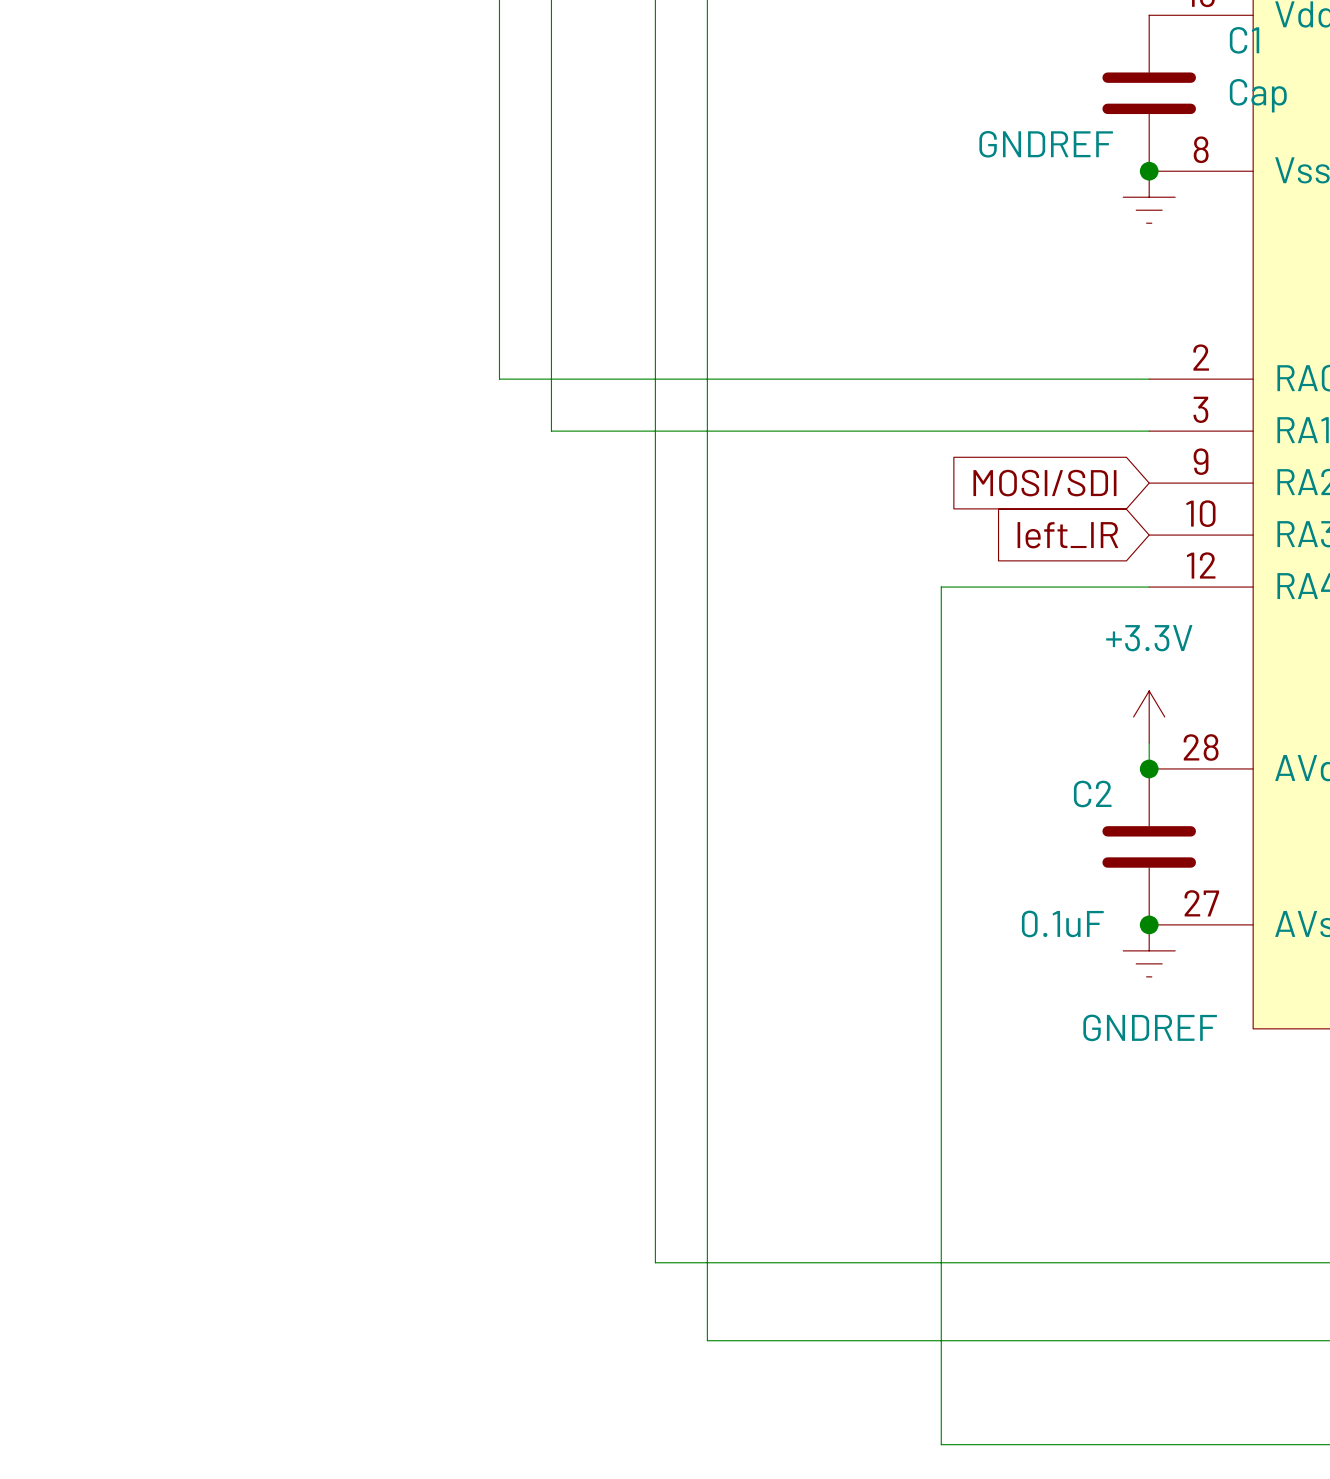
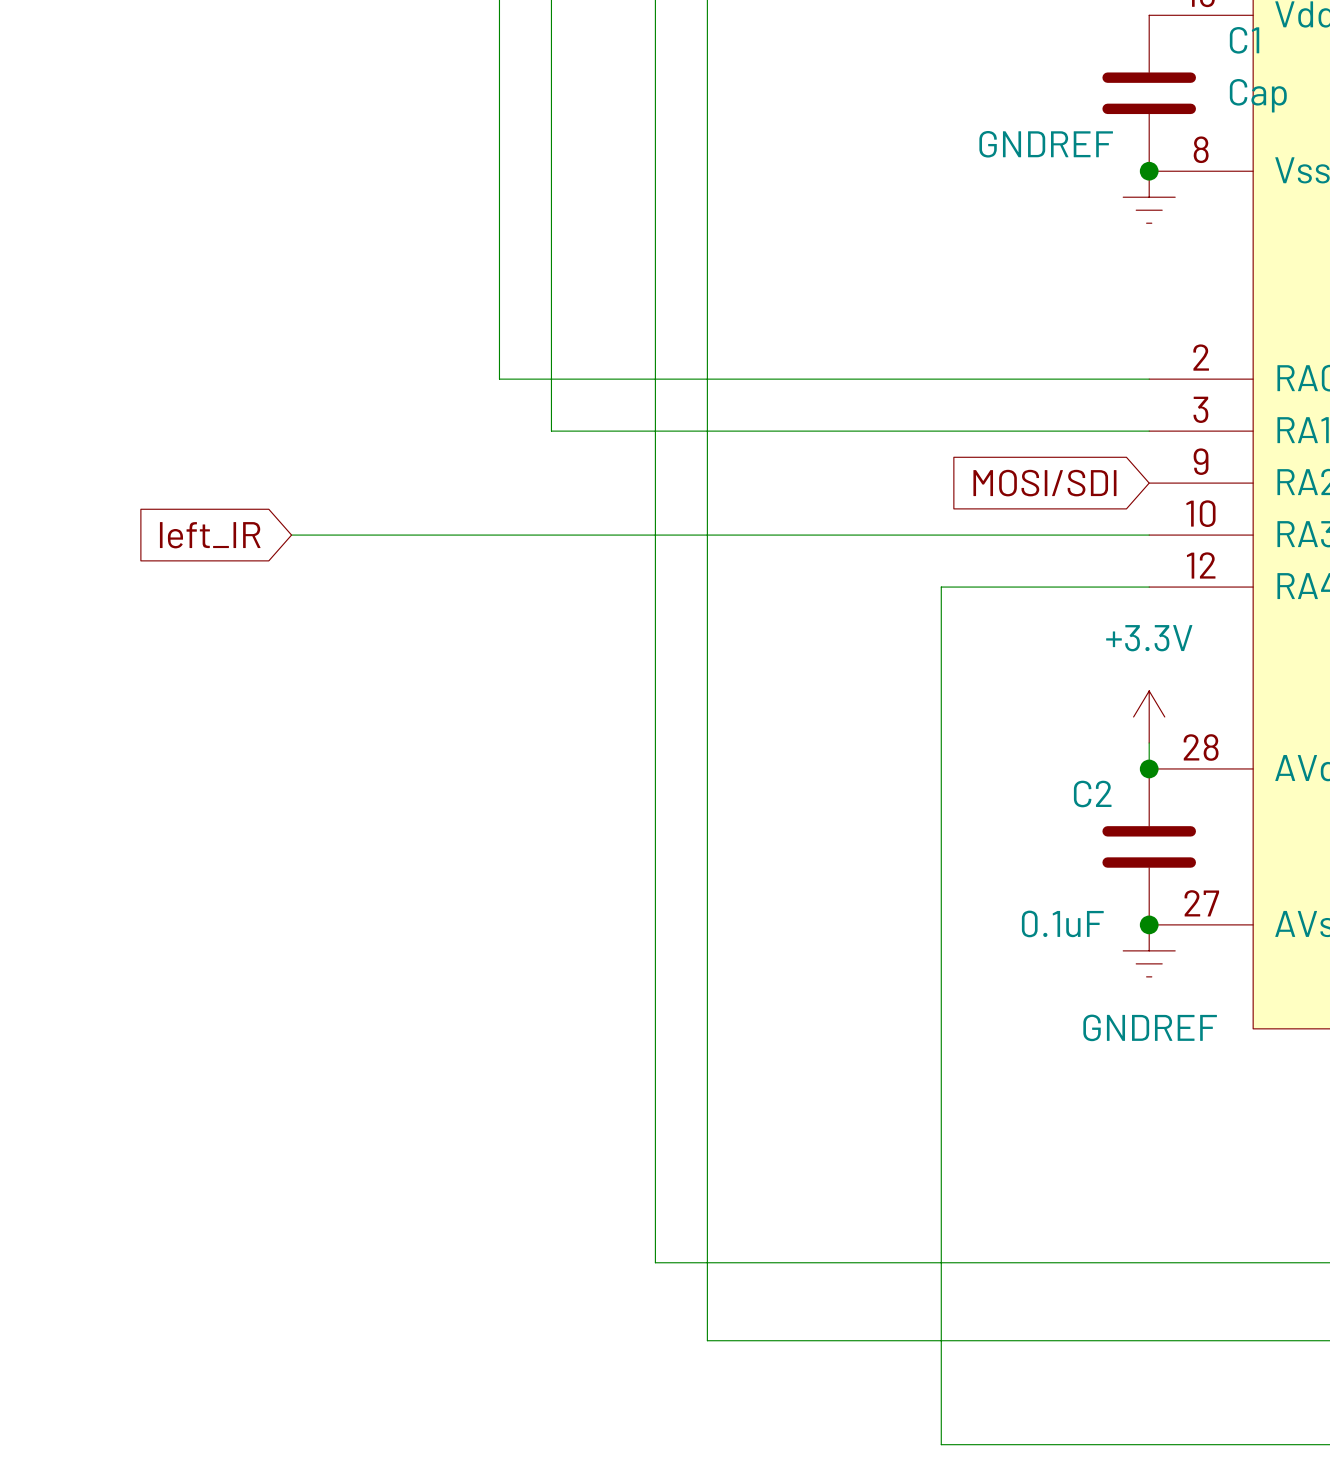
global label: none -> left_IR (210, 535)
wire: none -> (291, 535) (1149, 535)
global label: left_IR (1067, 535) -> none

